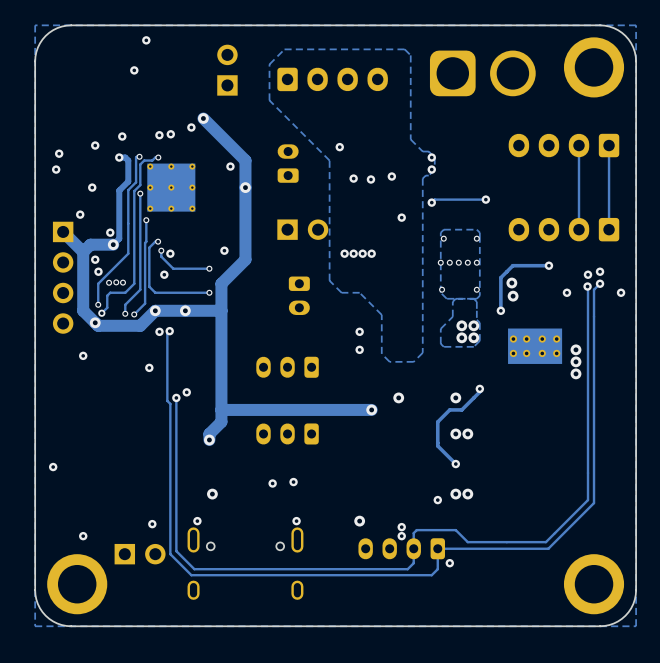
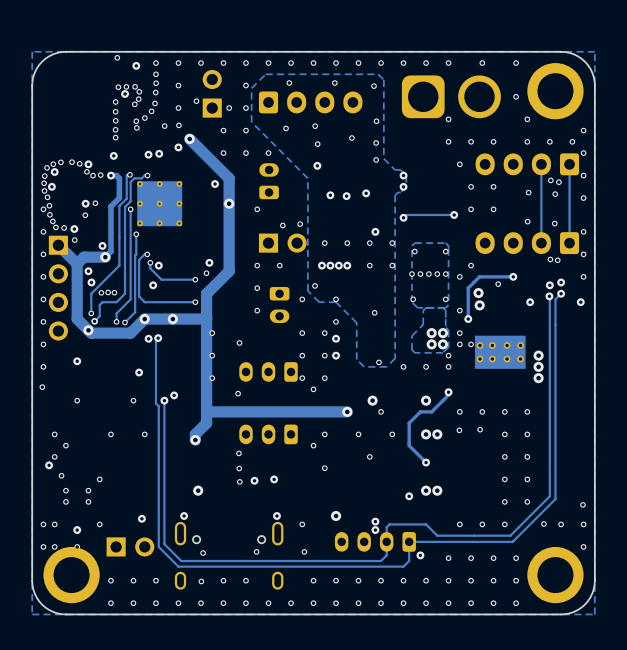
via: none -> (117, 57)
via: none -> (155, 63)
via: none -> (178, 63)
via: none -> (200, 63)
via: none -> (223, 63)
via: none -> (246, 63)
via: none -> (268, 63)
via: none -> (291, 63)
via: none -> (313, 63)
via: none -> (336, 63)
via: none -> (358, 63)
via: none -> (381, 63)
via: none -> (403, 63)
via: none -> (426, 63)
via: none -> (448, 63)
via: none -> (482, 63)
via: none -> (516, 63)
via: none -> (155, 74)
via: none -> (156, 83)
via: none -> (289, 83)
via: none -> (334, 83)
via: none -> (178, 85)
via: none -> (246, 85)
via: none -> (126, 86)
via: none -> (135, 86)
via: none -> (374, 86)
via: none -> (118, 87)
via: none -> (139, 91)
via: none -> (155, 92)
via: none -> (516, 96)
via: none -> (138, 99)
via: none -> (115, 101)
via: none -> (196, 101)
via: none -> (154, 103)
via: none -> (134, 104)
via: none -> (178, 108)
via: none -> (229, 108)
via: none -> (246, 108)
via: none -> (151, 111)
via: none -> (115, 111)
via: none -> (144, 118)
via: none -> (448, 119)
via: none -> (527, 119)
via: none -> (115, 120)
via: none -> (136, 121)
via: none -> (376, 121)
via: none -> (178, 125)
via: none -> (164, 126)
via: none -> (315, 126)
via: none -> (136, 127)
via: none -> (286, 128)
via: none -> (115, 129)
via: none -> (223, 130)
via: none -> (246, 130)
via: none -> (583, 130)
via: none -> (115, 137)
via: none -> (351, 138)
via: none -> (448, 141)
via: none -> (471, 141)
via: none -> (493, 141)
via: none -> (527, 141)
via: none -> (549, 141)
via: none -> (572, 141)
via: none -> (376, 142)
via: none -> (317, 144)
via: none -> (223, 153)
via: none -> (246, 153)
via: none -> (268, 153)
via: none -> (583, 153)
via: none -> (376, 159)
via: none -> (60, 162)
via: none -> (72, 162)
via: none -> (79, 163)
via: none -> (53, 164)
via: none -> (459, 164)
via: none -> (47, 167)
via: none -> (86, 171)
via: none -> (93, 175)
via: none -> (100, 175)
via: none -> (583, 175)
via: none -> (44, 176)
via: none -> (550, 180)
via: none -> (558, 182)
via: none -> (44, 183)
via: none -> (471, 186)
via: none -> (493, 186)
via: none -> (44, 190)
via: none -> (528, 192)
via: none -> (555, 194)
via: none -> (47, 197)
via: none -> (583, 198)
via: none -> (95, 203)
via: none -> (49, 205)
via: none -> (43, 209)
via: none -> (257, 209)
via: none -> (471, 209)
via: none -> (493, 209)
via: none -> (49, 214)
via: none -> (85, 215)
via: none -> (52, 221)
via: none -> (527, 221)
via: none -> (554, 223)
via: none -> (300, 224)
via: none -> (282, 225)
via: none -> (55, 227)
via: none -> (64, 227)
via: none -> (43, 231)
via: none -> (583, 231)
via: none -> (74, 240)
via: none -> (324, 243)
via: none -> (347, 243)
via: none -> (369, 243)
via: none -> (392, 243)
via: none -> (43, 254)
via: none -> (583, 254)
via: none -> (550, 259)
via: none -> (557, 260)
via: none -> (257, 265)
via: none -> (279, 265)
via: none -> (369, 265)
via: none -> (392, 265)
via: none -> (471, 265)
via: none -> (206, 273)
via: none -> (43, 276)
via: none -> (459, 276)
via: none -> (583, 276)
via: none -> (498, 284)
via: none -> (315, 285)
via: none -> (257, 288)
via: none -> (43, 299)
via: none -> (302, 299)
via: none -> (336, 299)
via: none -> (257, 310)
via: none -> (459, 310)
via: none -> (374, 312)
via: none -> (43, 321)
via: none -> (336, 321)
via: none -> (212, 333)
via: none -> (302, 333)
via: none -> (324, 333)
via: none -> (459, 333)
via: none -> (239, 342)
via: none -> (43, 344)
via: none -> (459, 344)
via: none -> (471, 344)
via: none -> (212, 355)
via: none -> (302, 355)
via: none -> (324, 355)
via: none -> (448, 355)
via: none -> (378, 362)
via: none -> (43, 366)
via: none -> (403, 366)
via: none -> (426, 366)
via: none -> (448, 366)
via: none -> (212, 378)
via: none -> (302, 378)
via: none -> (324, 378)
via: none -> (42, 387)
via: none -> (313, 389)
via: none -> (238, 393)
via: none -> (77, 400)
via: none -> (133, 400)
via: none -> (381, 411)
via: none -> (459, 411)
via: none -> (482, 411)
via: none -> (504, 411)
via: none -> (527, 411)
via: none -> (480, 429)
via: none -> (459, 430)
via: none -> (54, 434)
via: none -> (110, 434)
via: none -> (144, 434)
via: none -> (324, 434)
via: none -> (358, 434)
via: none -> (392, 434)
via: none -> (504, 434)
via: none -> (527, 434)
via: none -> (65, 445)
via: none -> (313, 445)
via: none -> (238, 453)
via: none -> (54, 456)
via: none -> (369, 456)
via: none -> (504, 456)
via: none -> (527, 456)
via: none -> (239, 468)
via: none -> (324, 468)
via: none -> (61, 475)
via: none -> (99, 479)
via: none -> (504, 479)
via: none -> (527, 479)
via: none -> (239, 481)
via: none -> (65, 490)
via: none -> (88, 490)
via: none -> (65, 501)
via: none -> (88, 501)
via: none -> (504, 501)
via: none -> (527, 501)
via: none -> (582, 504)
via: none -> (543, 523)
via: none -> (43, 524)
via: none -> (54, 524)
via: none -> (99, 524)
via: none -> (302, 524)
via: none -> (459, 524)
via: none -> (482, 524)
via: none -> (504, 524)
via: none -> (561, 524)
via: none -> (583, 524)
via: none -> (43, 546)
via: none -> (54, 546)
via: none -> (77, 546)
via: none -> (583, 546)
via: none -> (256, 551)
via: none -> (304, 551)
via: none -> (203, 553)
via: none -> (448, 558)
via: none -> (471, 558)
via: none -> (493, 558)
via: none -> (516, 558)
via: none -> (110, 580)
via: none -> (133, 580)
via: none -> (155, 580)
via: none -> (223, 580)
via: none -> (246, 580)
via: none -> (313, 580)
via: none -> (336, 580)
via: none -> (358, 580)
via: none -> (381, 580)
via: none -> (403, 580)
via: none -> (426, 580)
via: none -> (448, 580)
via: none -> (471, 580)
via: none -> (493, 580)
via: none -> (516, 580)
via: none -> (201, 581)
via: none -> (110, 603)
via: none -> (133, 603)
via: none -> (155, 603)
via: none -> (178, 603)
via: none -> (200, 603)
via: none -> (223, 603)
via: none -> (246, 603)
via: none -> (268, 603)
via: none -> (291, 603)
via: none -> (313, 603)
via: none -> (336, 603)
via: none -> (358, 603)
via: none -> (381, 603)
via: none -> (403, 603)
via: none -> (426, 603)
via: none -> (448, 603)
via: none -> (471, 603)
via: none -> (493, 603)
via: none -> (516, 603)

